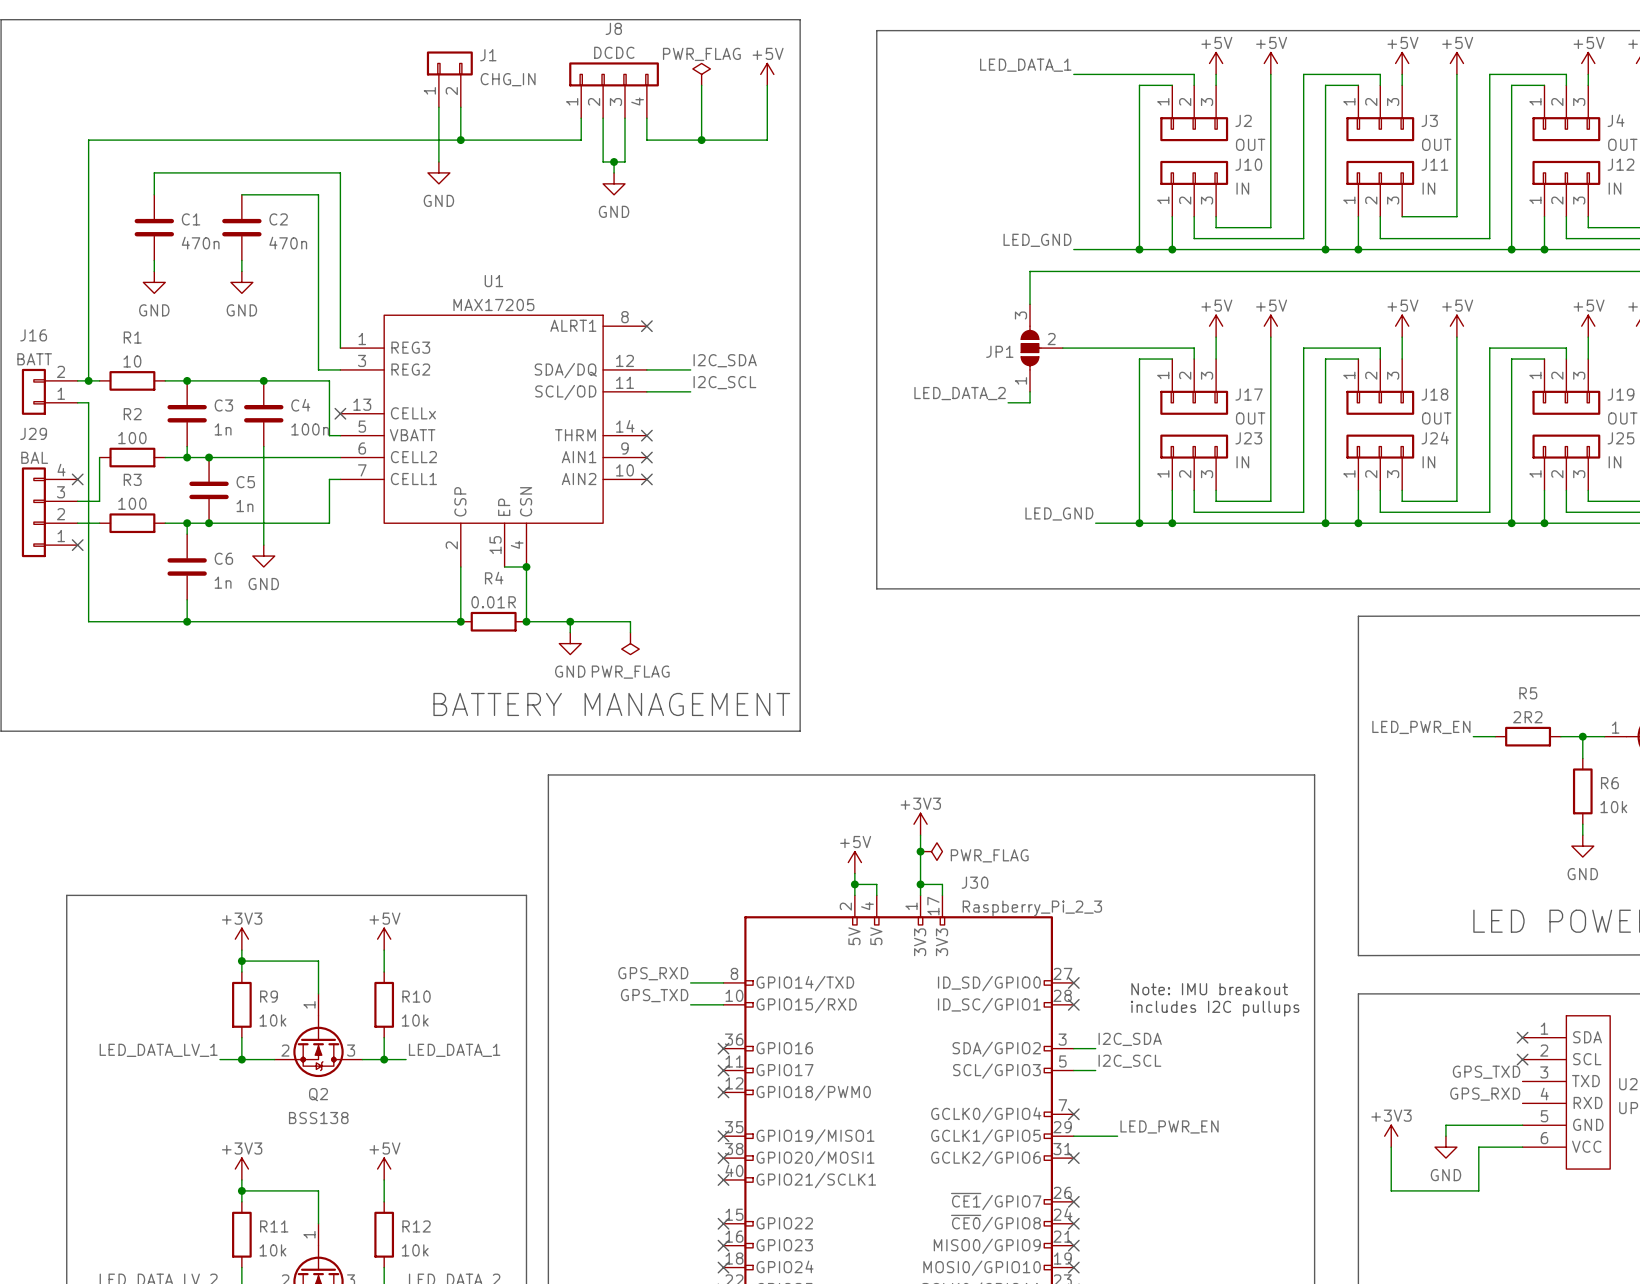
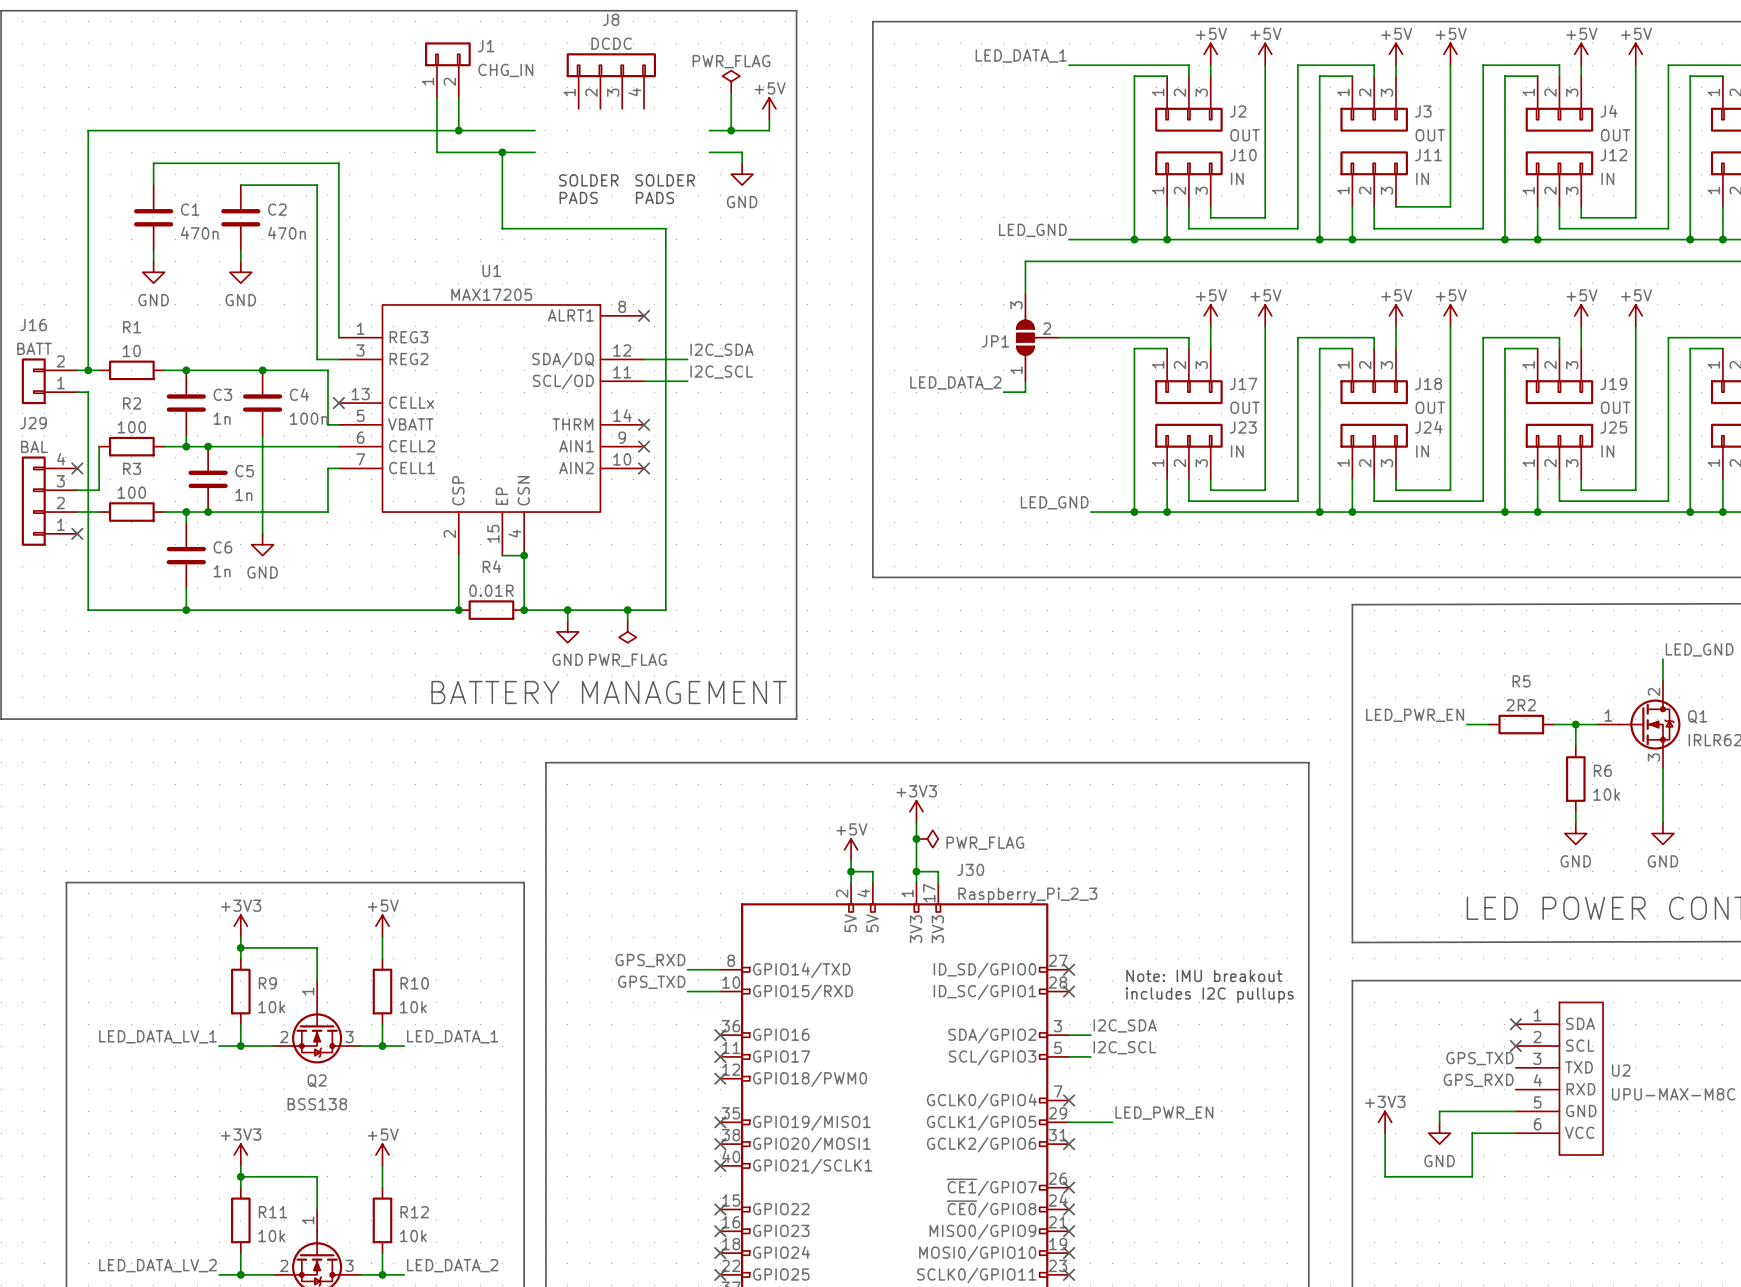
power symbol position: PWR_FLAG (701, 74) -> PWR_FLAG (731, 81)
power symbol position: +5V (767, 74) -> +5V (769, 108)
wire: (701, 85) (701, 140) -> none
wire: (767, 85) (767, 140) -> (769, 119) (769, 130) (763, 130)
wire: none -> (731, 92) (731, 130)
wire: (581, 118) (581, 140) (537, 140) -> none
wire: (603, 118) (603, 161) (625, 161) (625, 118) -> none
wire: (646, 118) (646, 140) (712, 140) -> none
junction position: (701, 140) -> (731, 130)
wire: none -> (436, 152) (535, 152)
wire: none -> (502, 152) (502, 228) (665, 228) (665, 610) (627, 610)
junction: none -> (502, 152)
wire: (614, 161) (614, 172) -> none
junction: (614, 161) -> none
wire: none -> (709, 152) (742, 152) (742, 163)
power symbol: GND (438, 172) -> none
power symbol position: GND (614, 183) -> GND (742, 174)
text: none -> SOLDER (588, 180)
text: none -> SOLDER (665, 180)
text: none -> PADS (578, 197)
text: none -> PADS (655, 197)
junction: none -> (627, 610)

